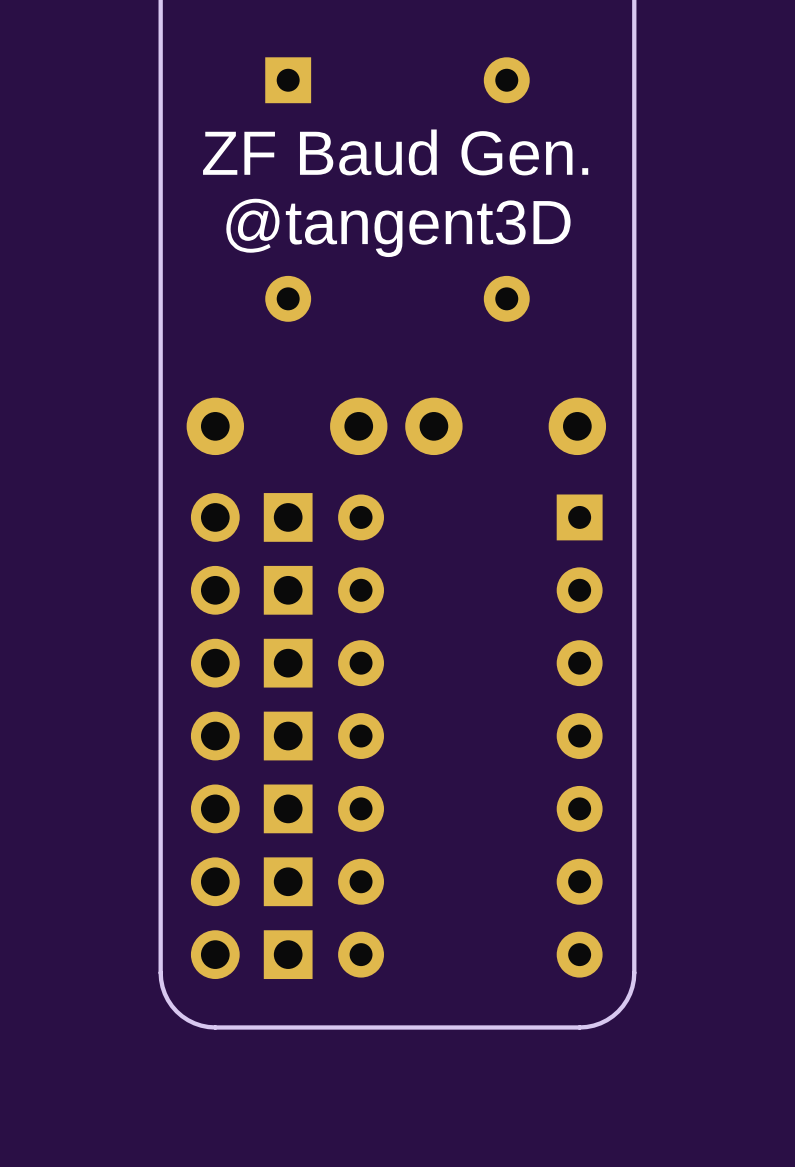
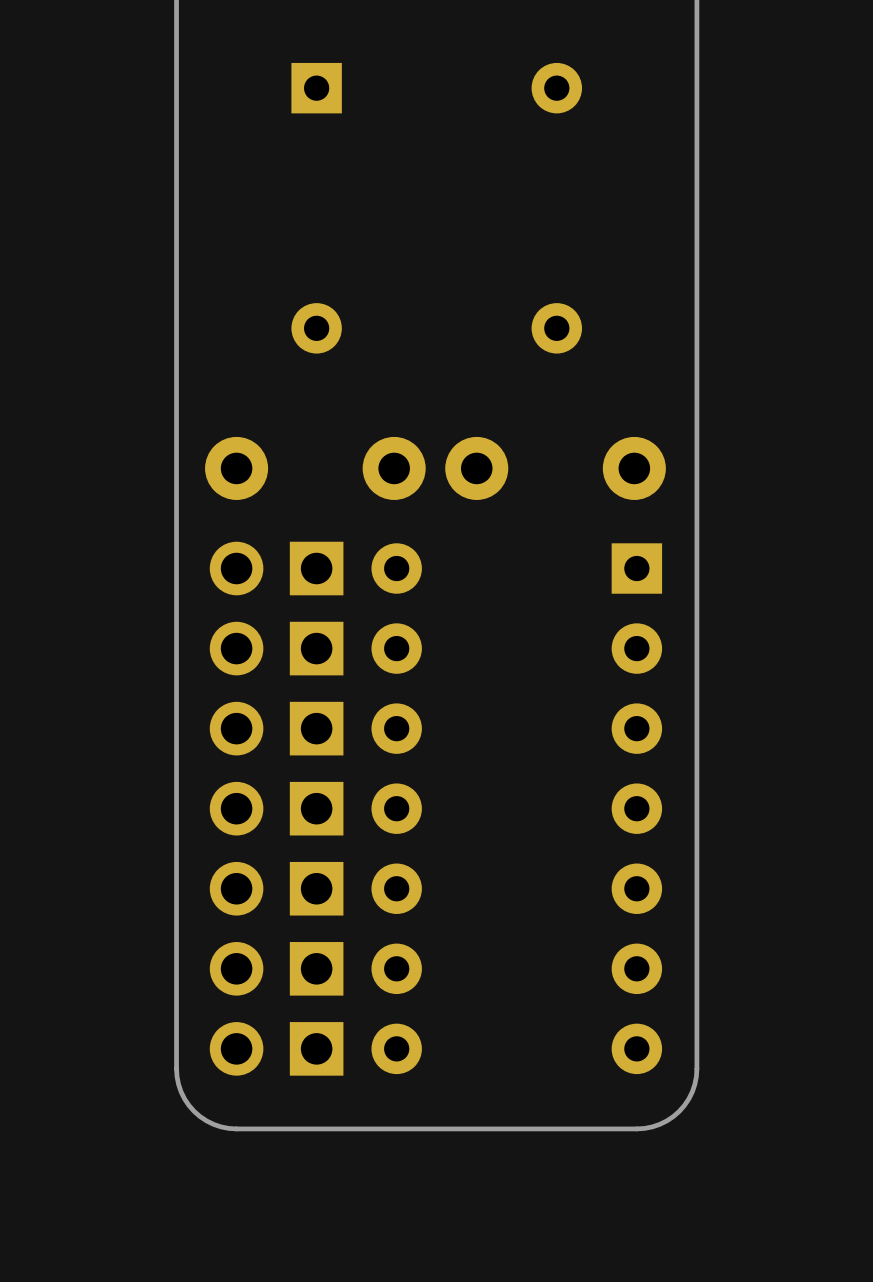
text: ZF Baud Gen. (395, 152) -> none
text: @tangent3D (398, 227) -> none

